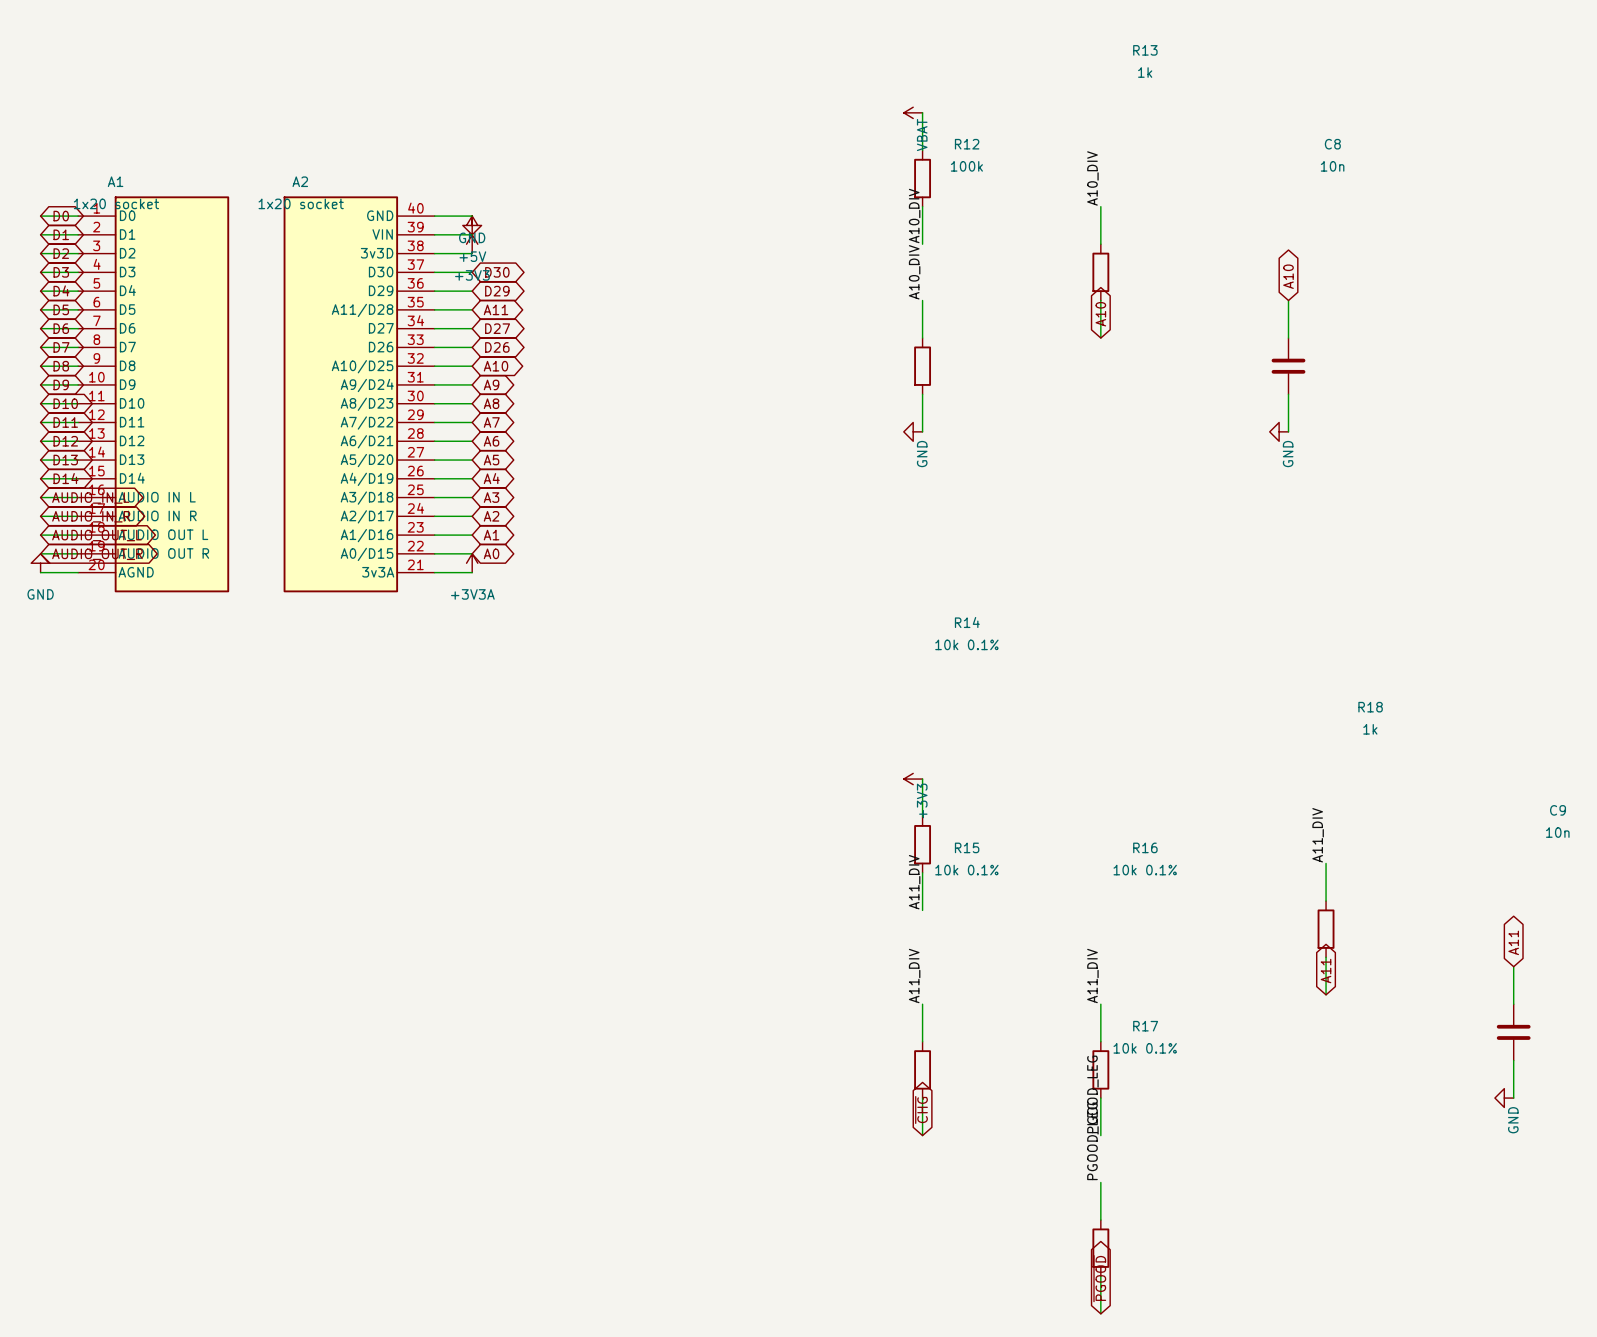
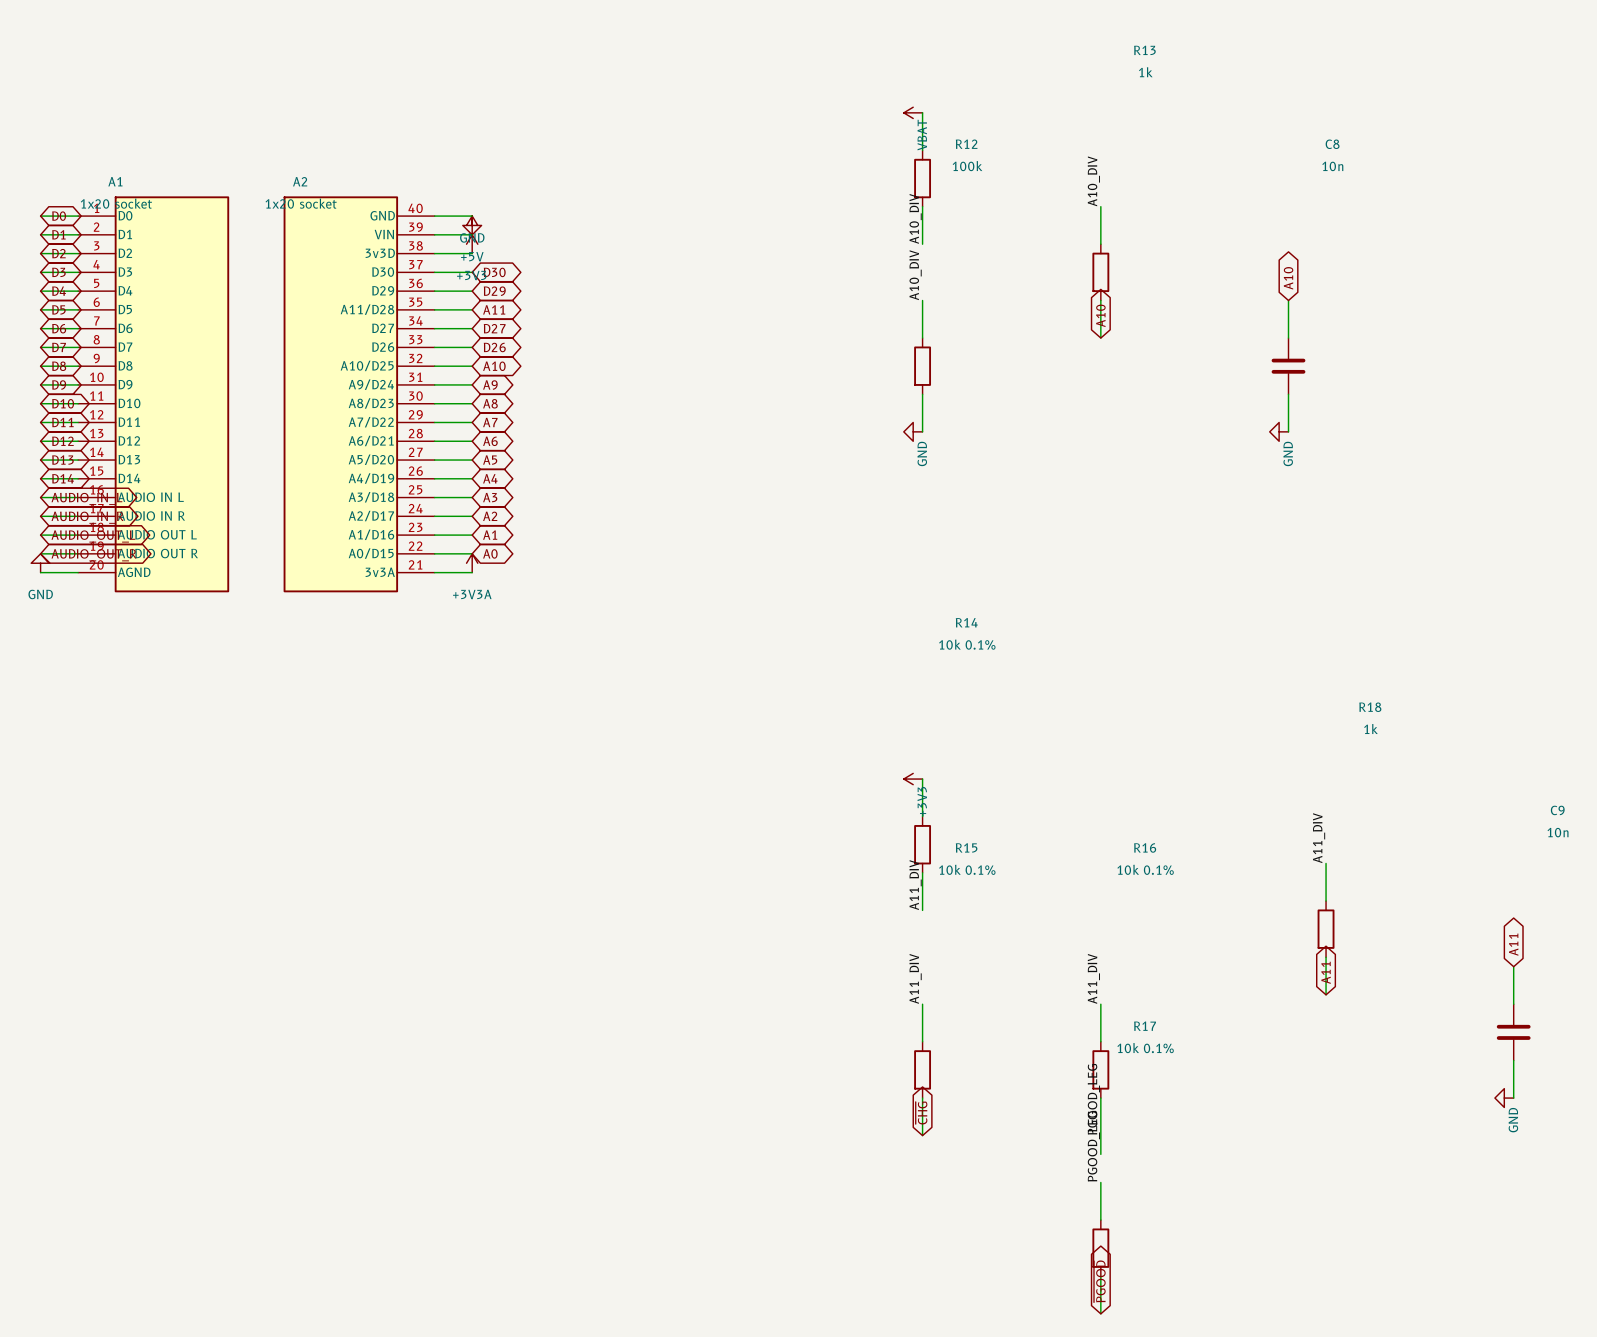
wire: none -> (1100, 1135) (1100, 1154)

